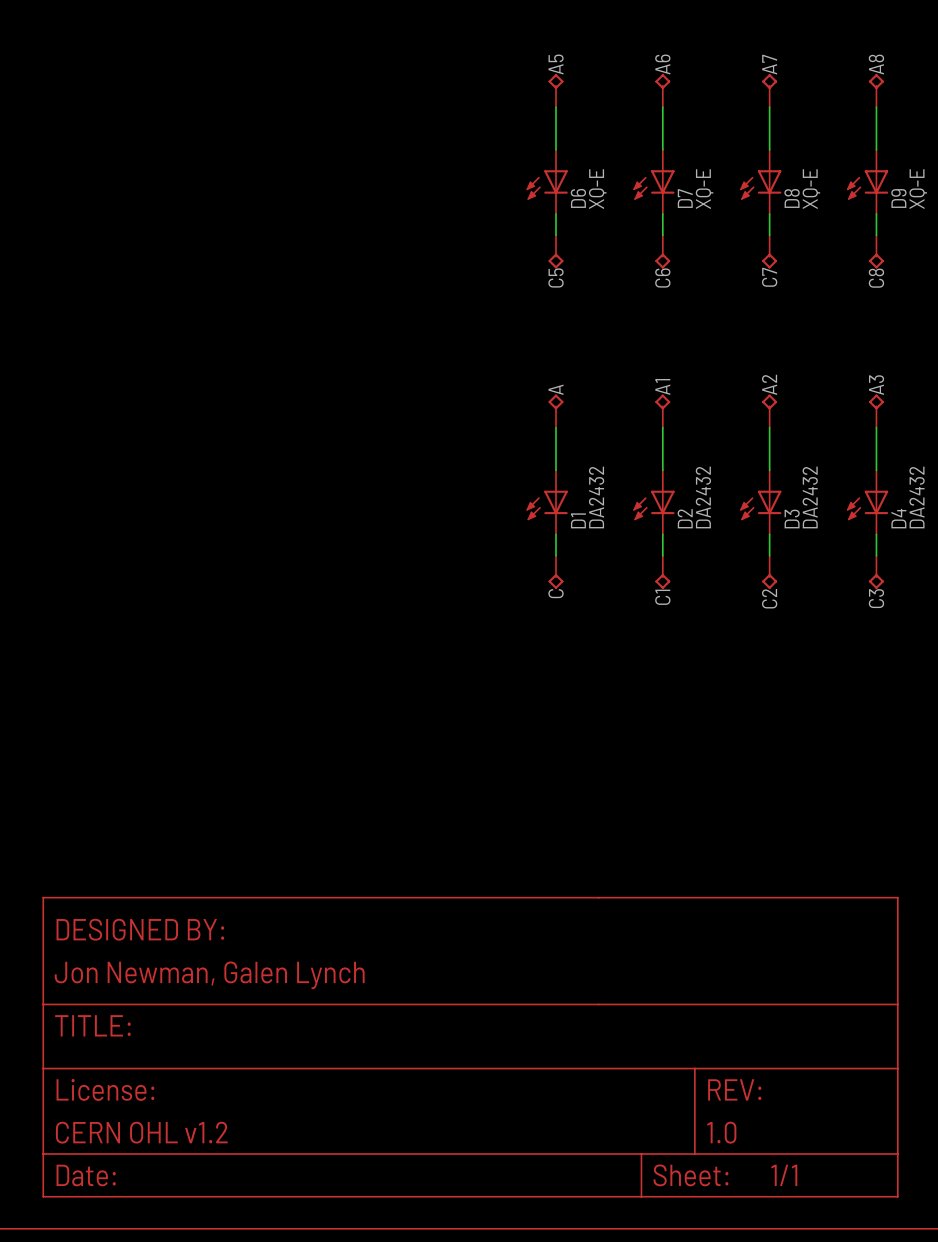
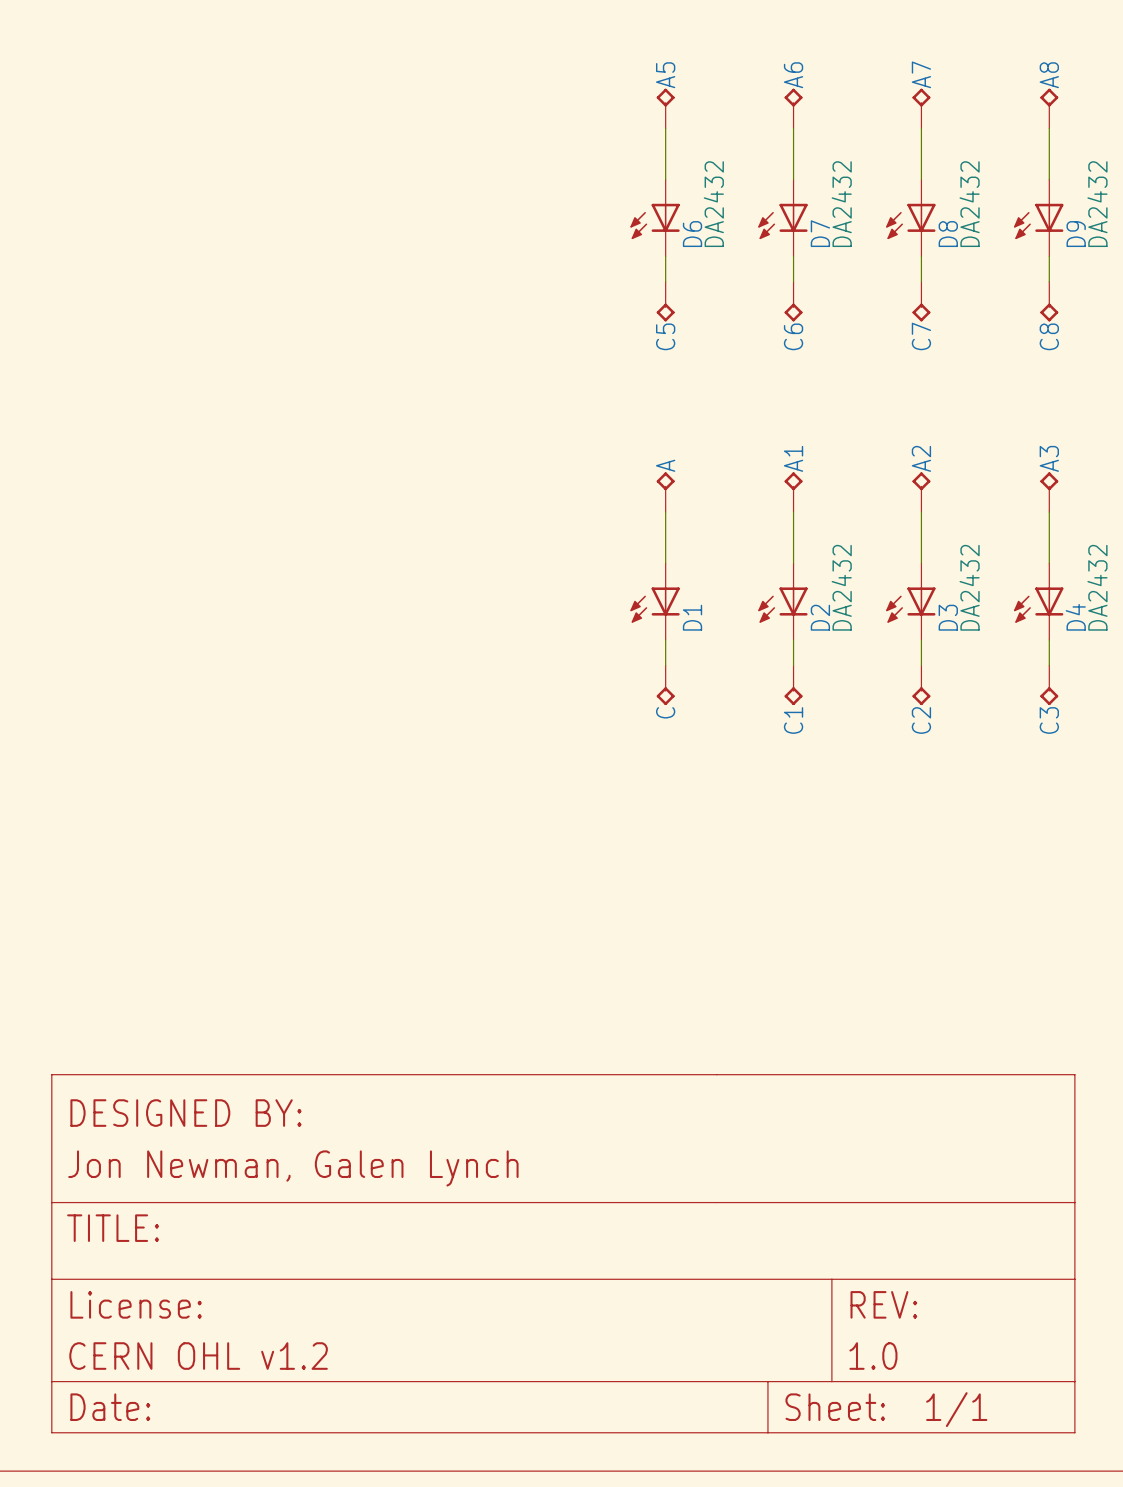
D6 value: XQ-E (597, 189) -> DA2432 (713, 204)
D7 value: XQ-E (704, 189) -> DA2432 (841, 204)
D8 value: XQ-E (811, 189) -> DA2432 (969, 204)
D9 value: XQ-E (918, 189) -> DA2432 (1097, 204)
D1 value: DA2432 (596, 497) -> none

